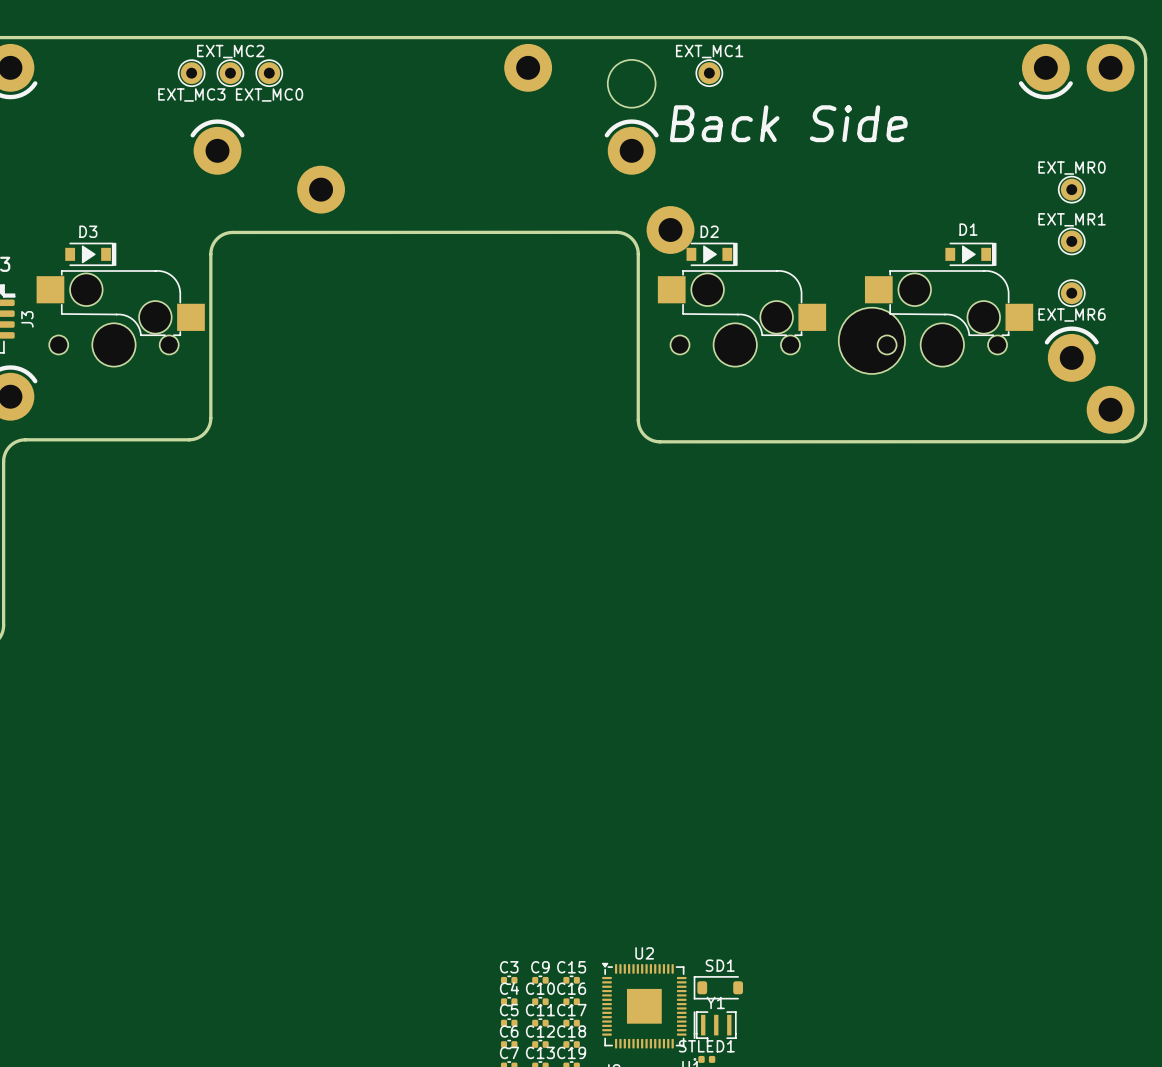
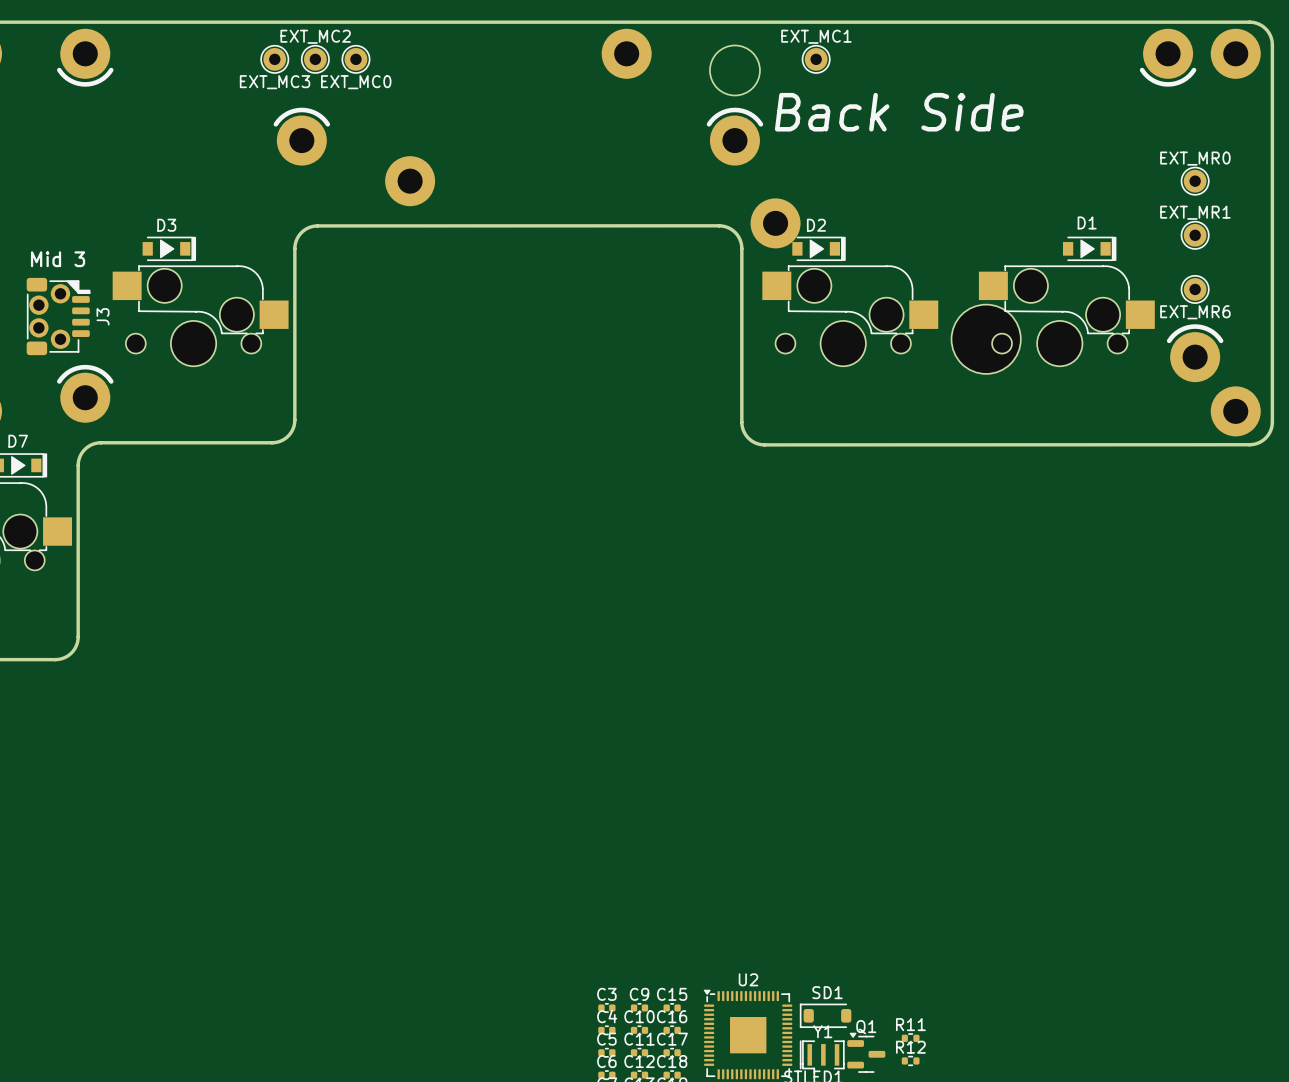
R11: none -> (910, 1038)
Q1: none -> (866, 1052)
R12: none -> (910, 1060)

